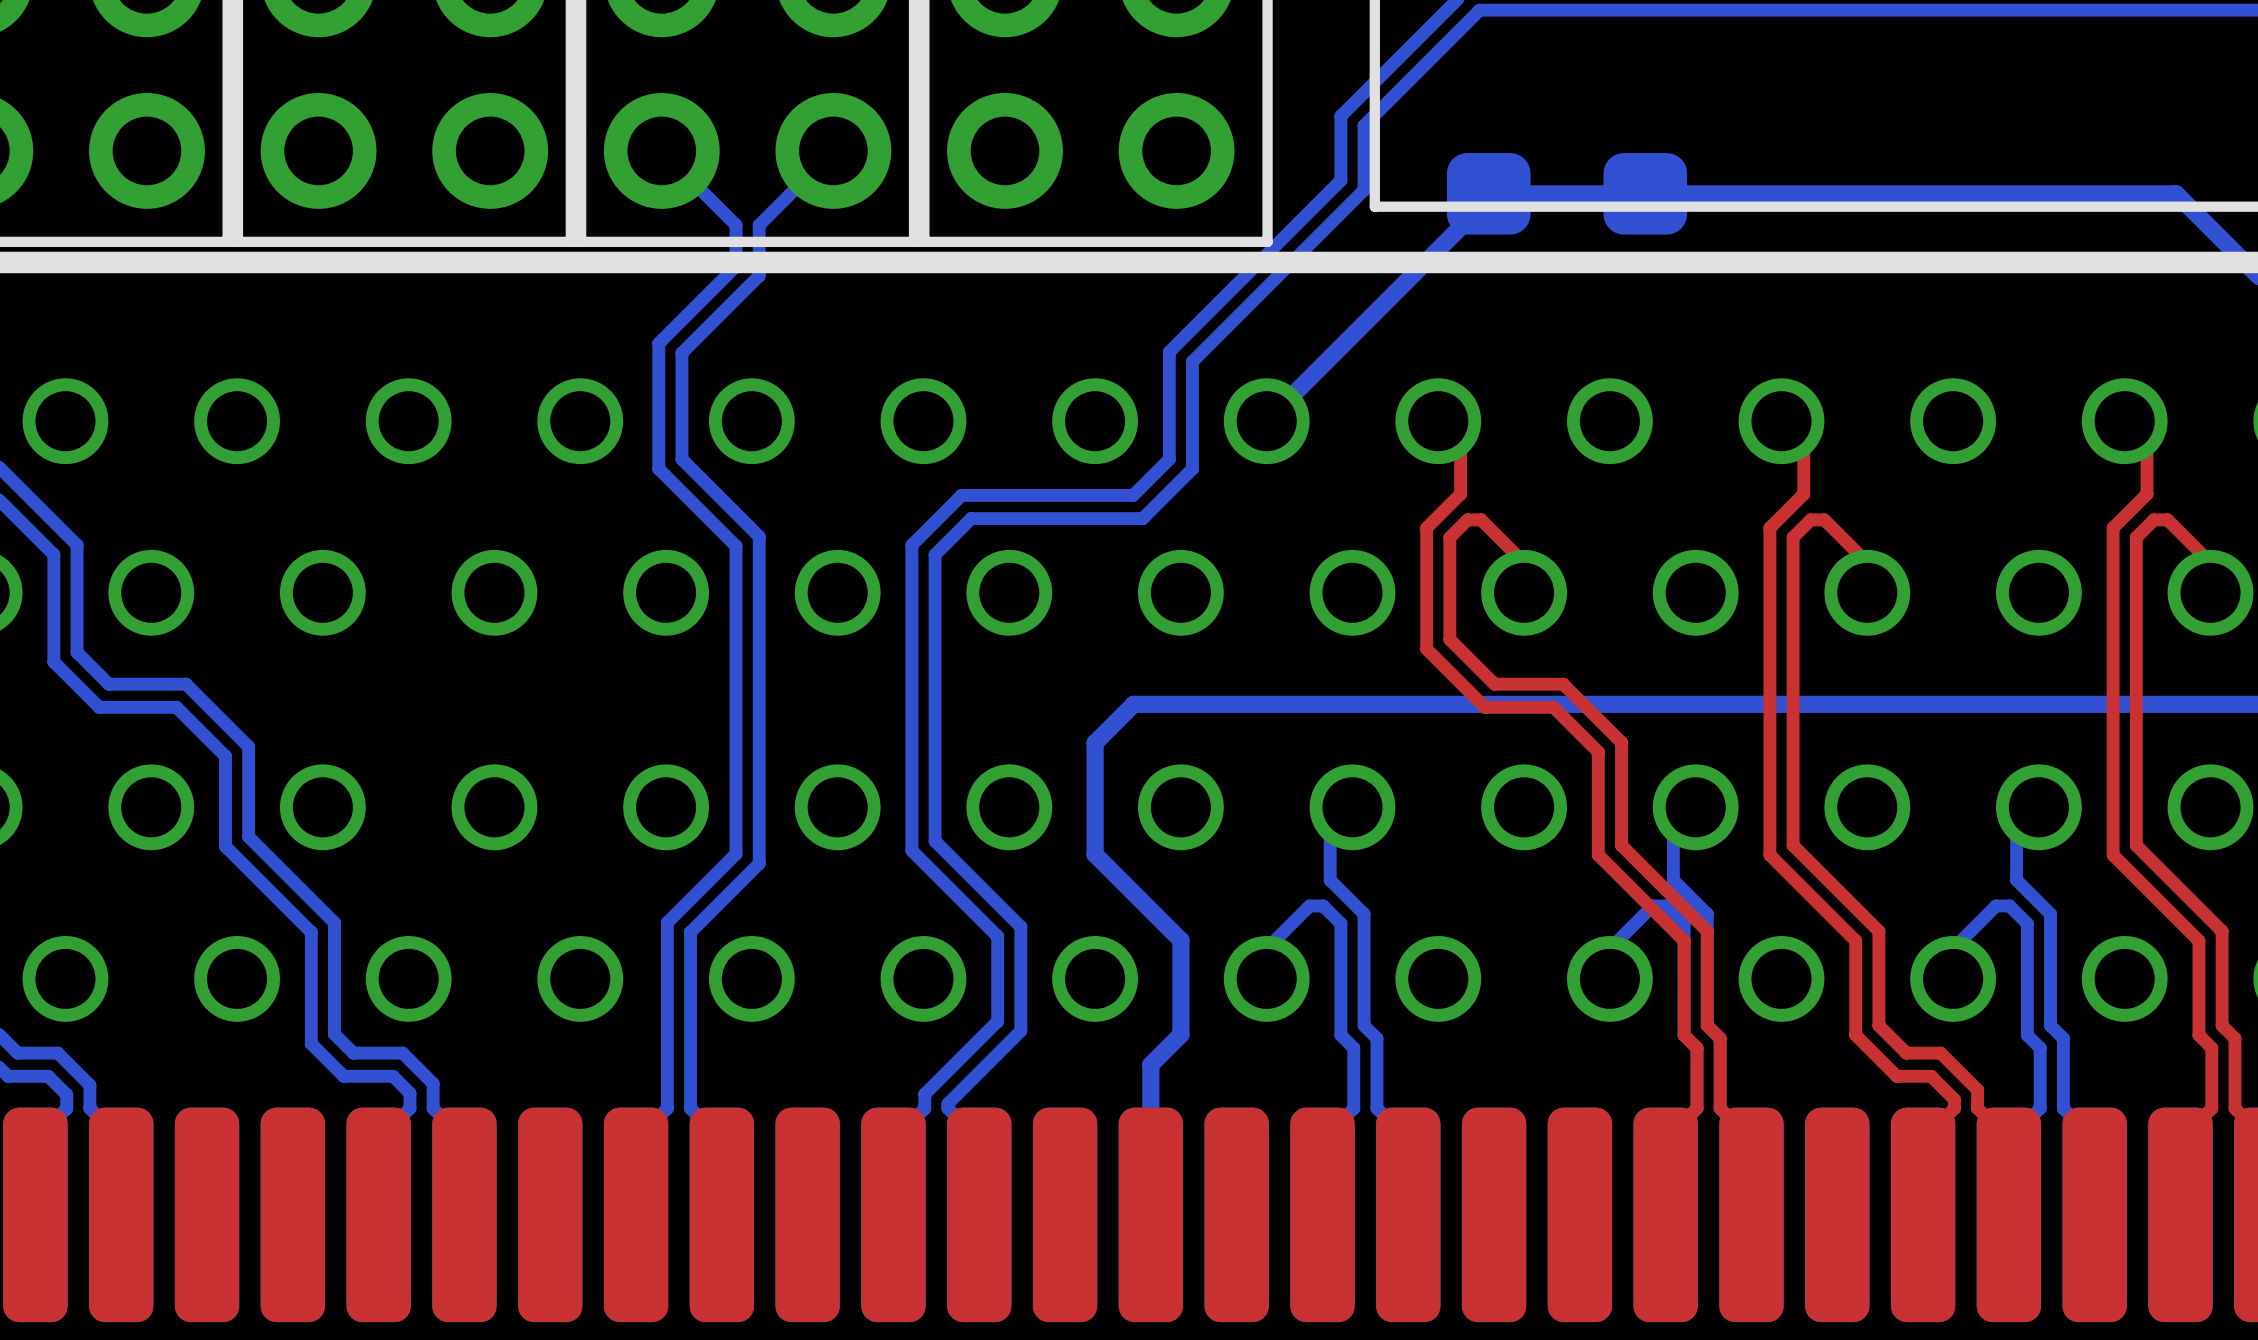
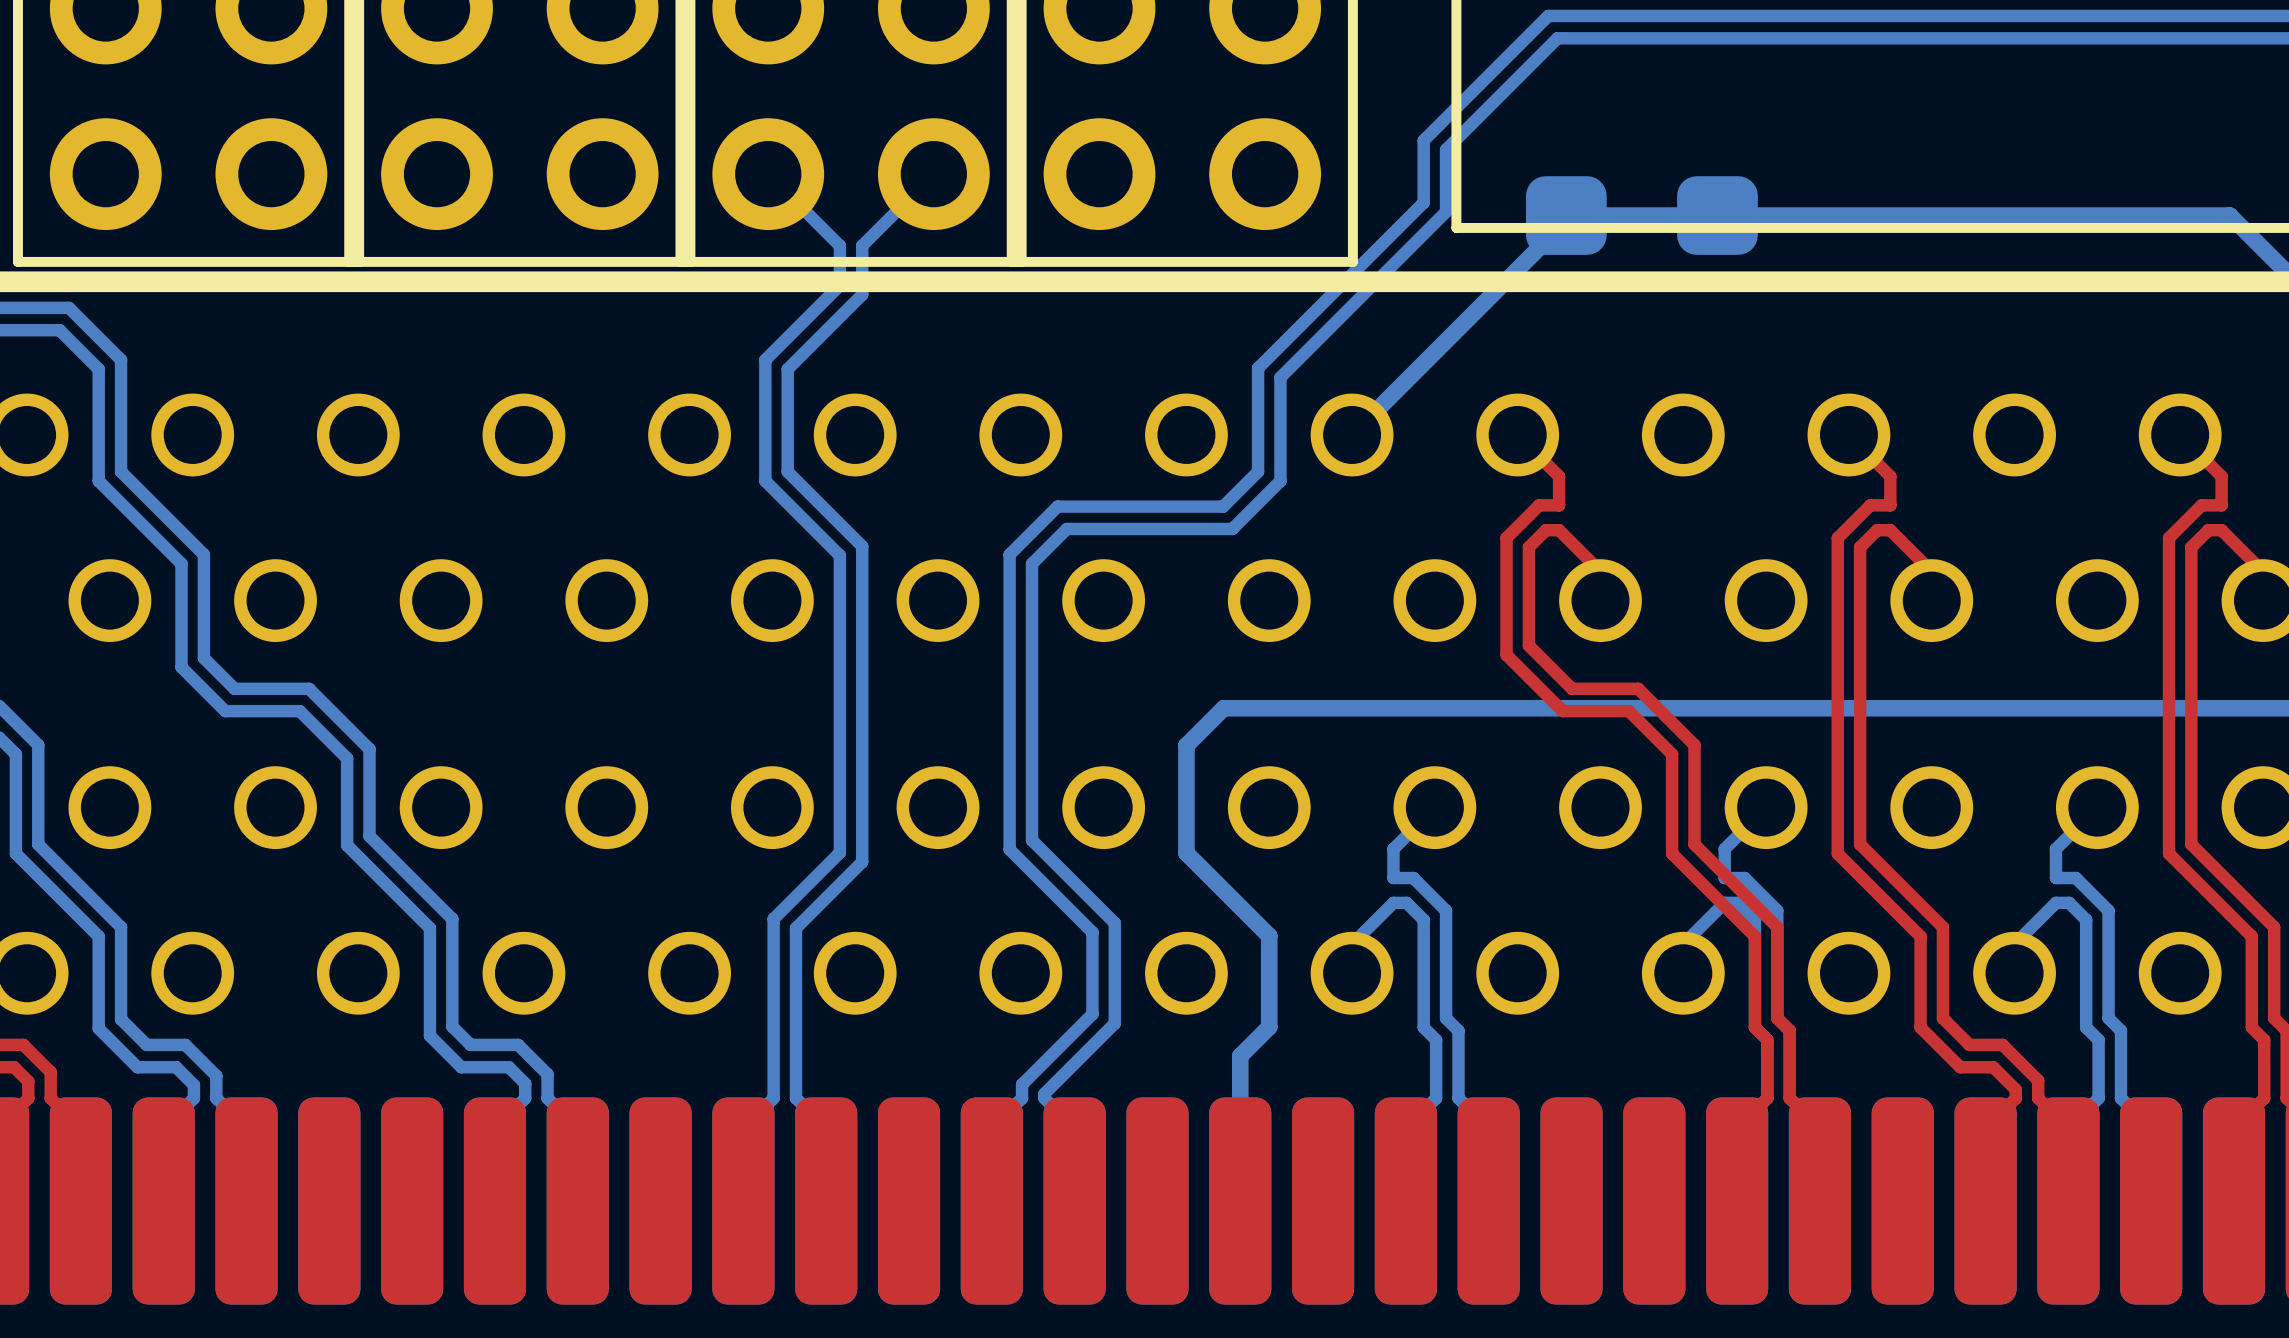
top track: (1460, 443) (1460, 494) -> (1539, 456) (1559, 476) (1559, 505) (1539, 505)
top track: (1803, 443) (1803, 494) -> (1870, 456) (1890, 476) (1890, 505) (1870, 505)
top track: (2147, 443) (2147, 494) -> (2201, 456) (2221, 476) (2221, 505) (2201, 505)
bottom track: (1330, 829) (1330, 880) -> (1413, 829) (1393, 849) (1393, 878) (1413, 878)
bottom track: (1673, 829) (1673, 880) -> (1744, 829) (1724, 849) (1724, 878) (1744, 878)
bottom track: (2016, 829) (2016, 880) -> (2075, 829) (2055, 849) (2055, 878) (2075, 878)

